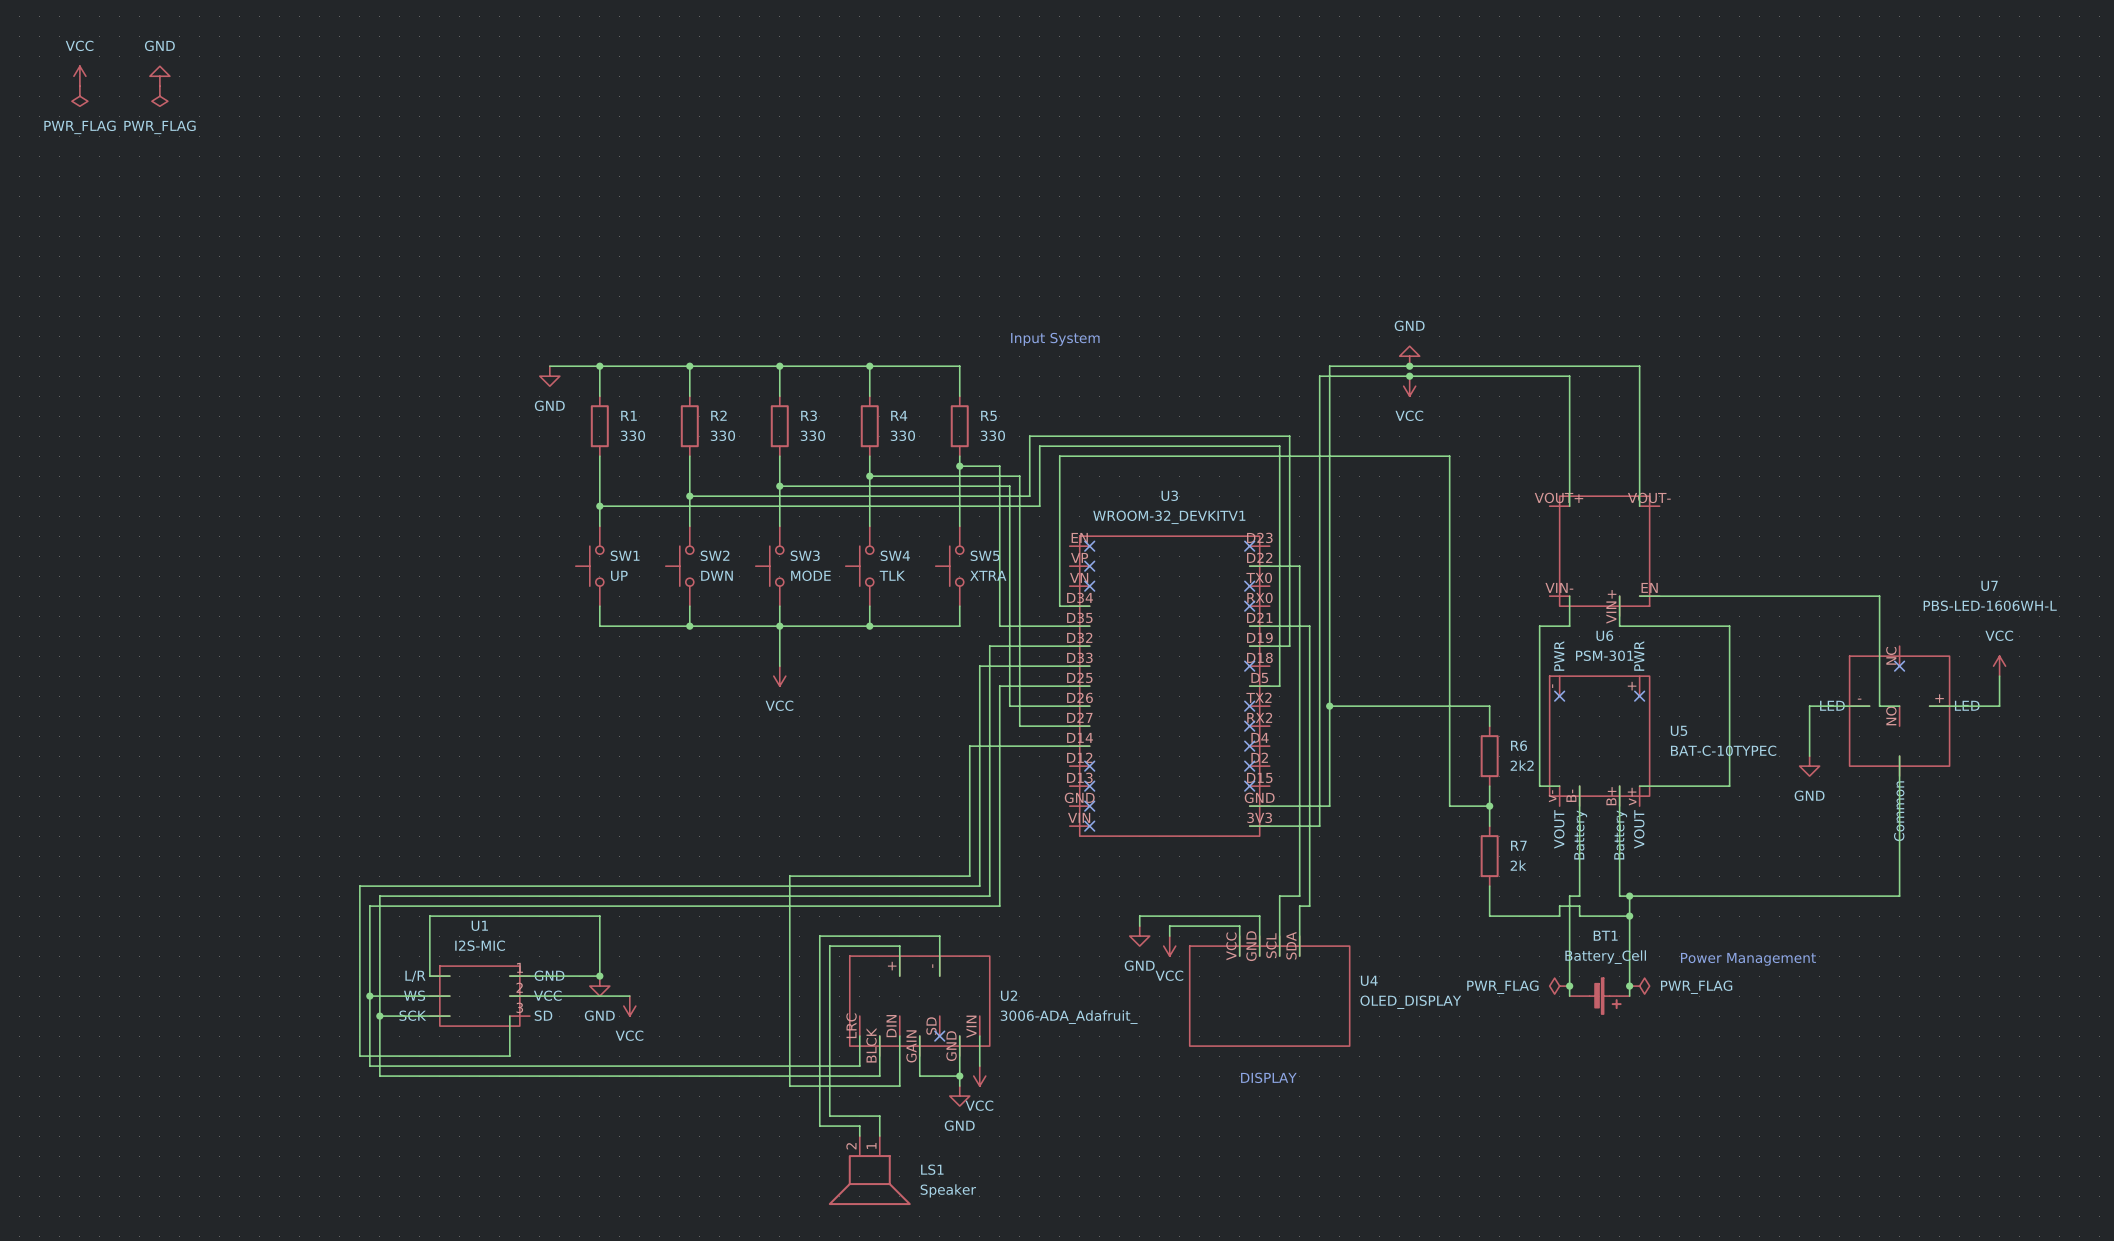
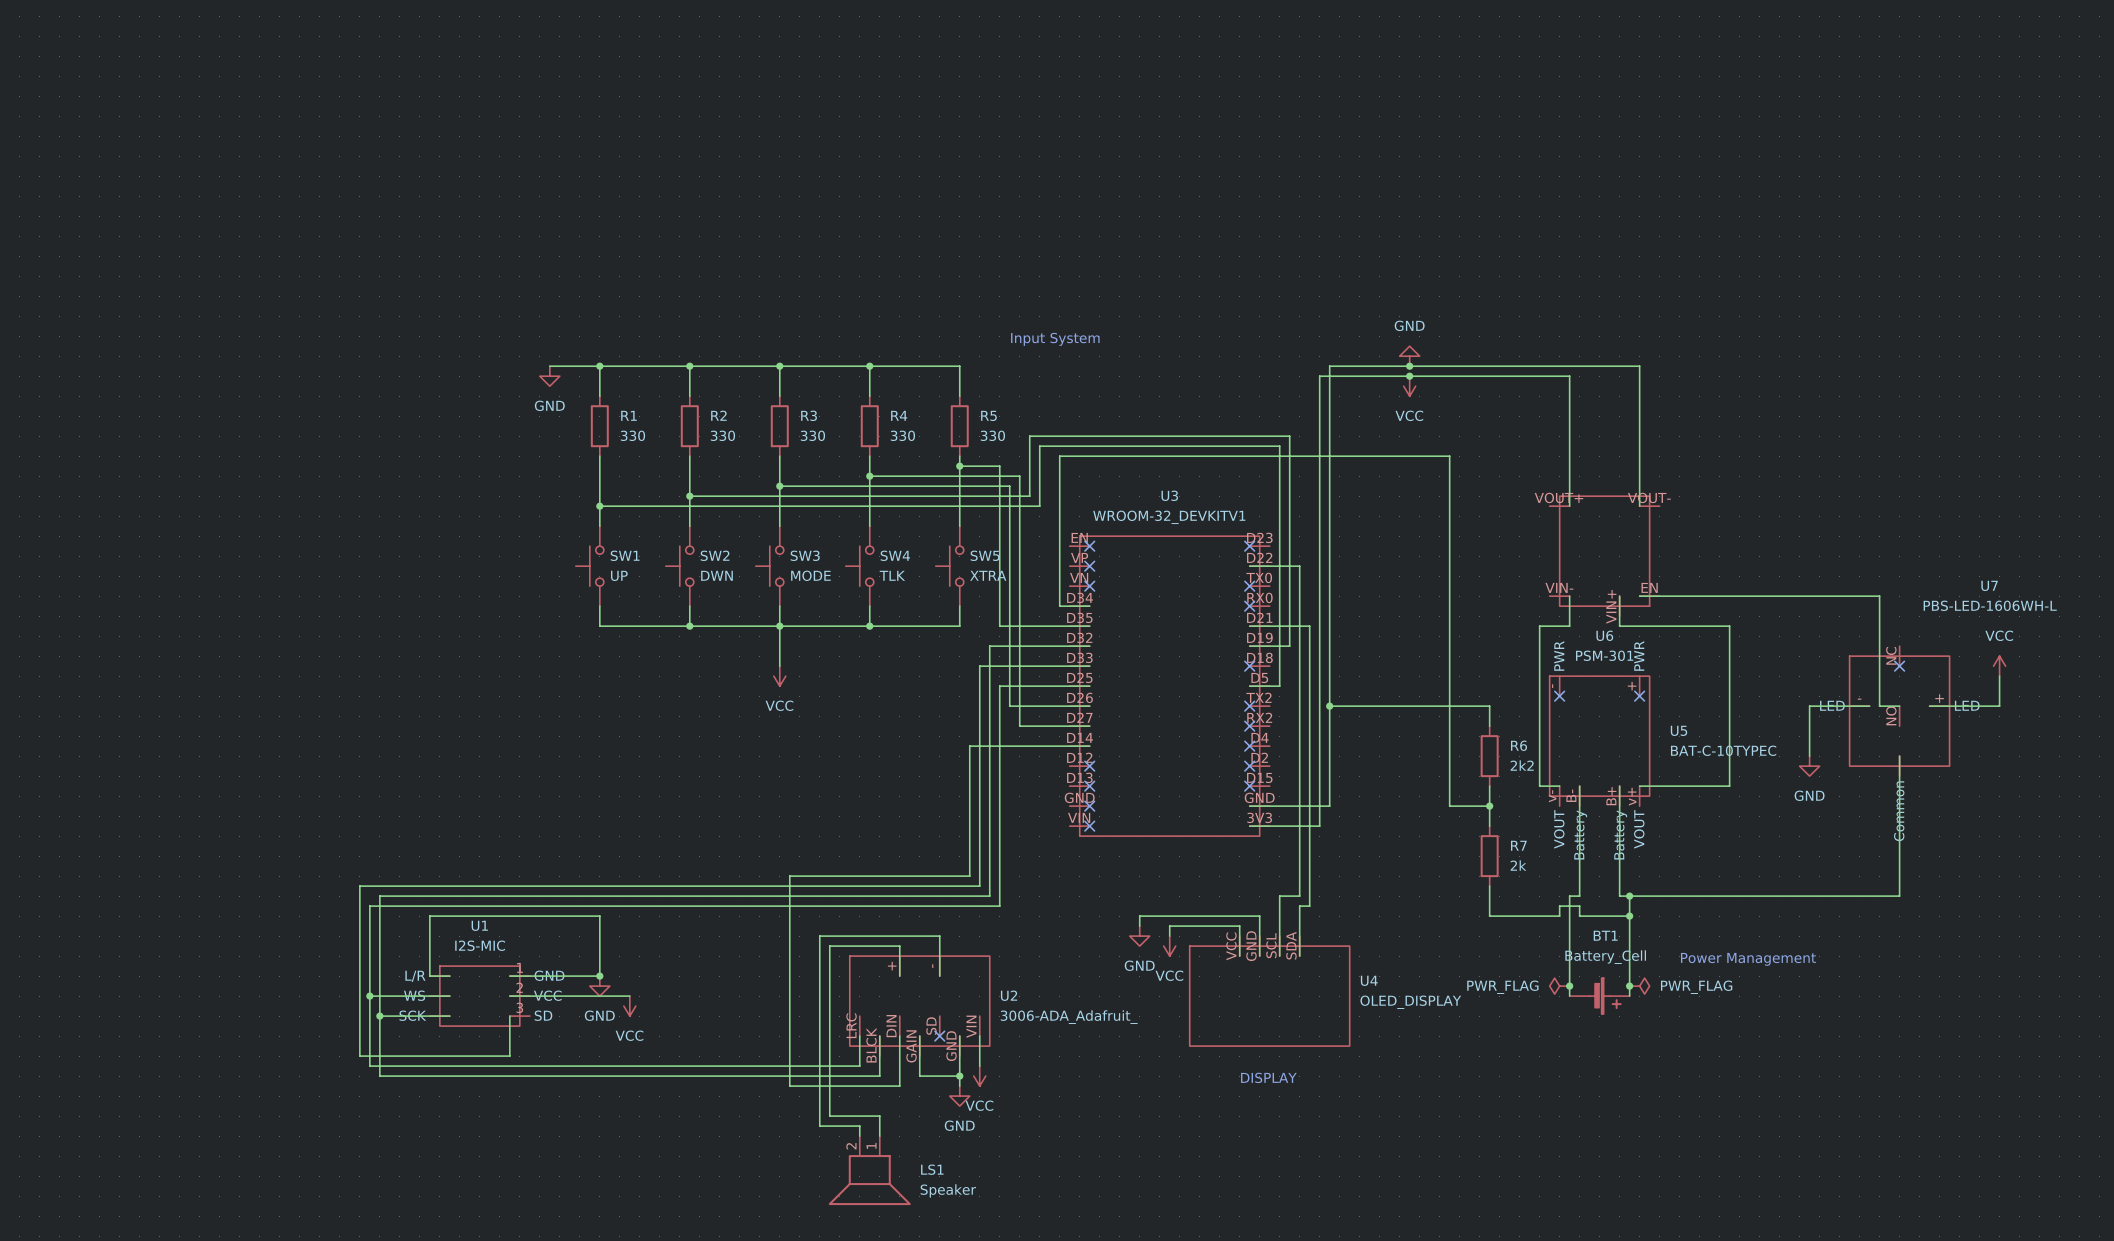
power symbol: VCC (79, 76) -> none
power symbol: GND (159, 76) -> none
power symbol: PWR_FLAG (79, 96) -> none
power symbol: PWR_FLAG (159, 96) -> none

